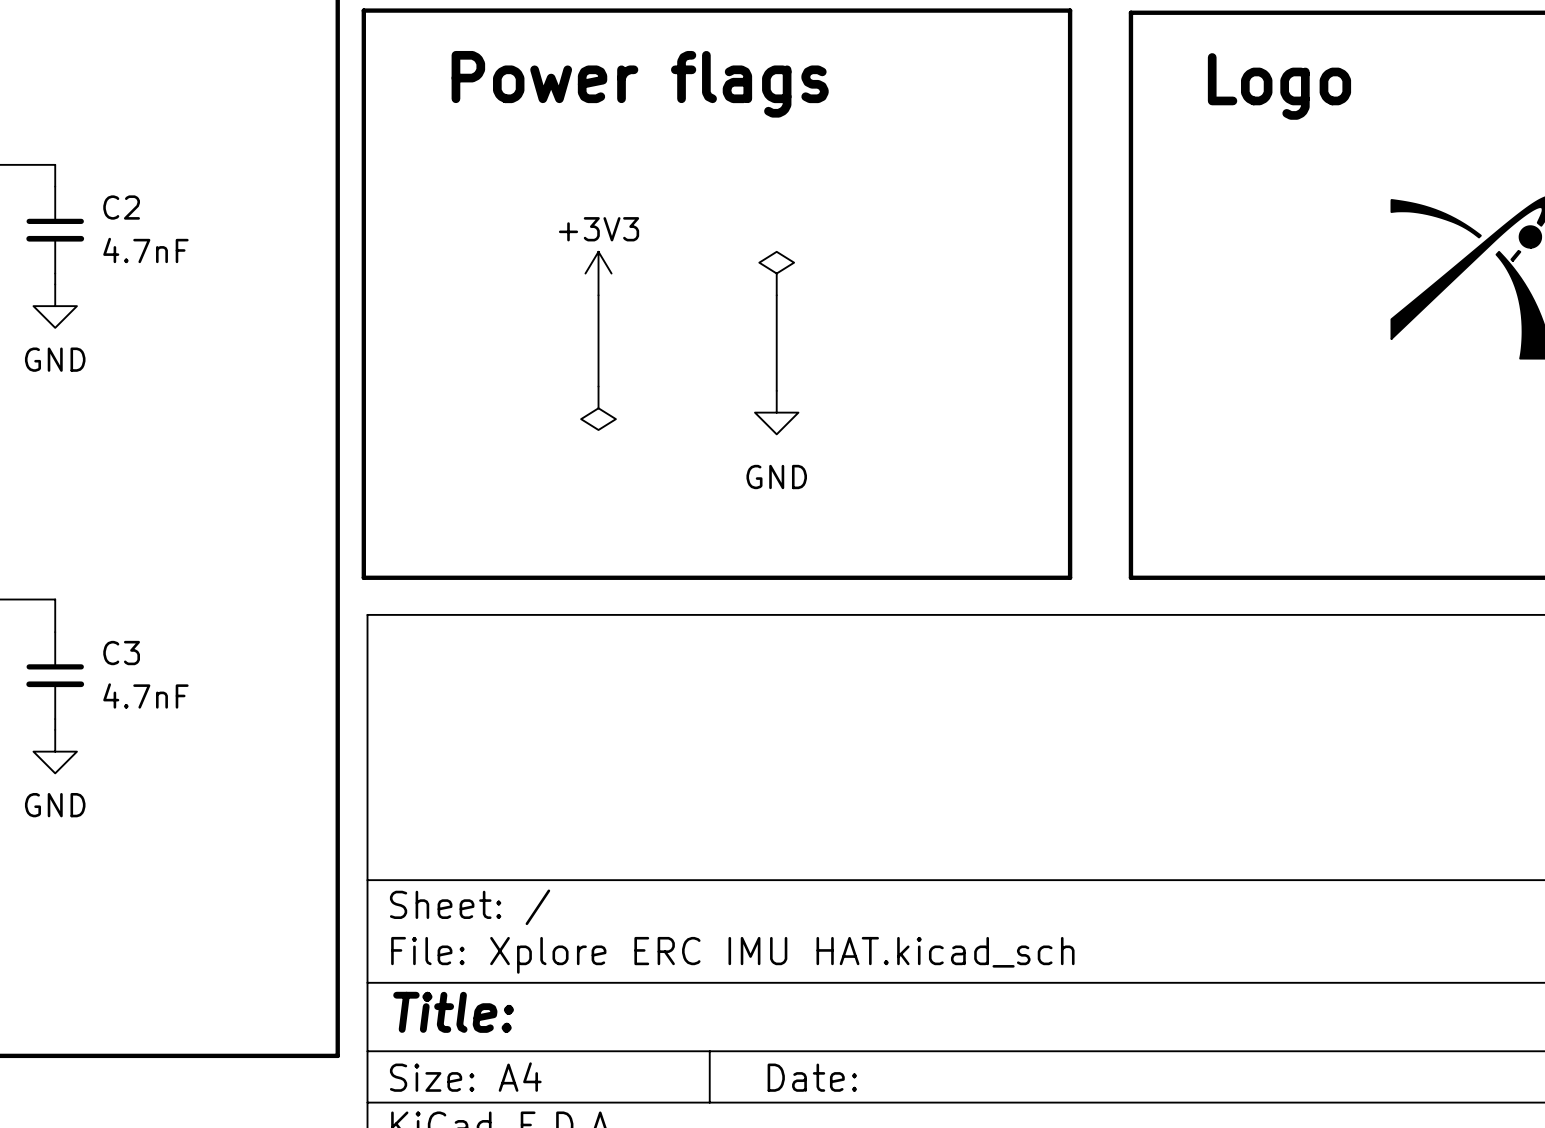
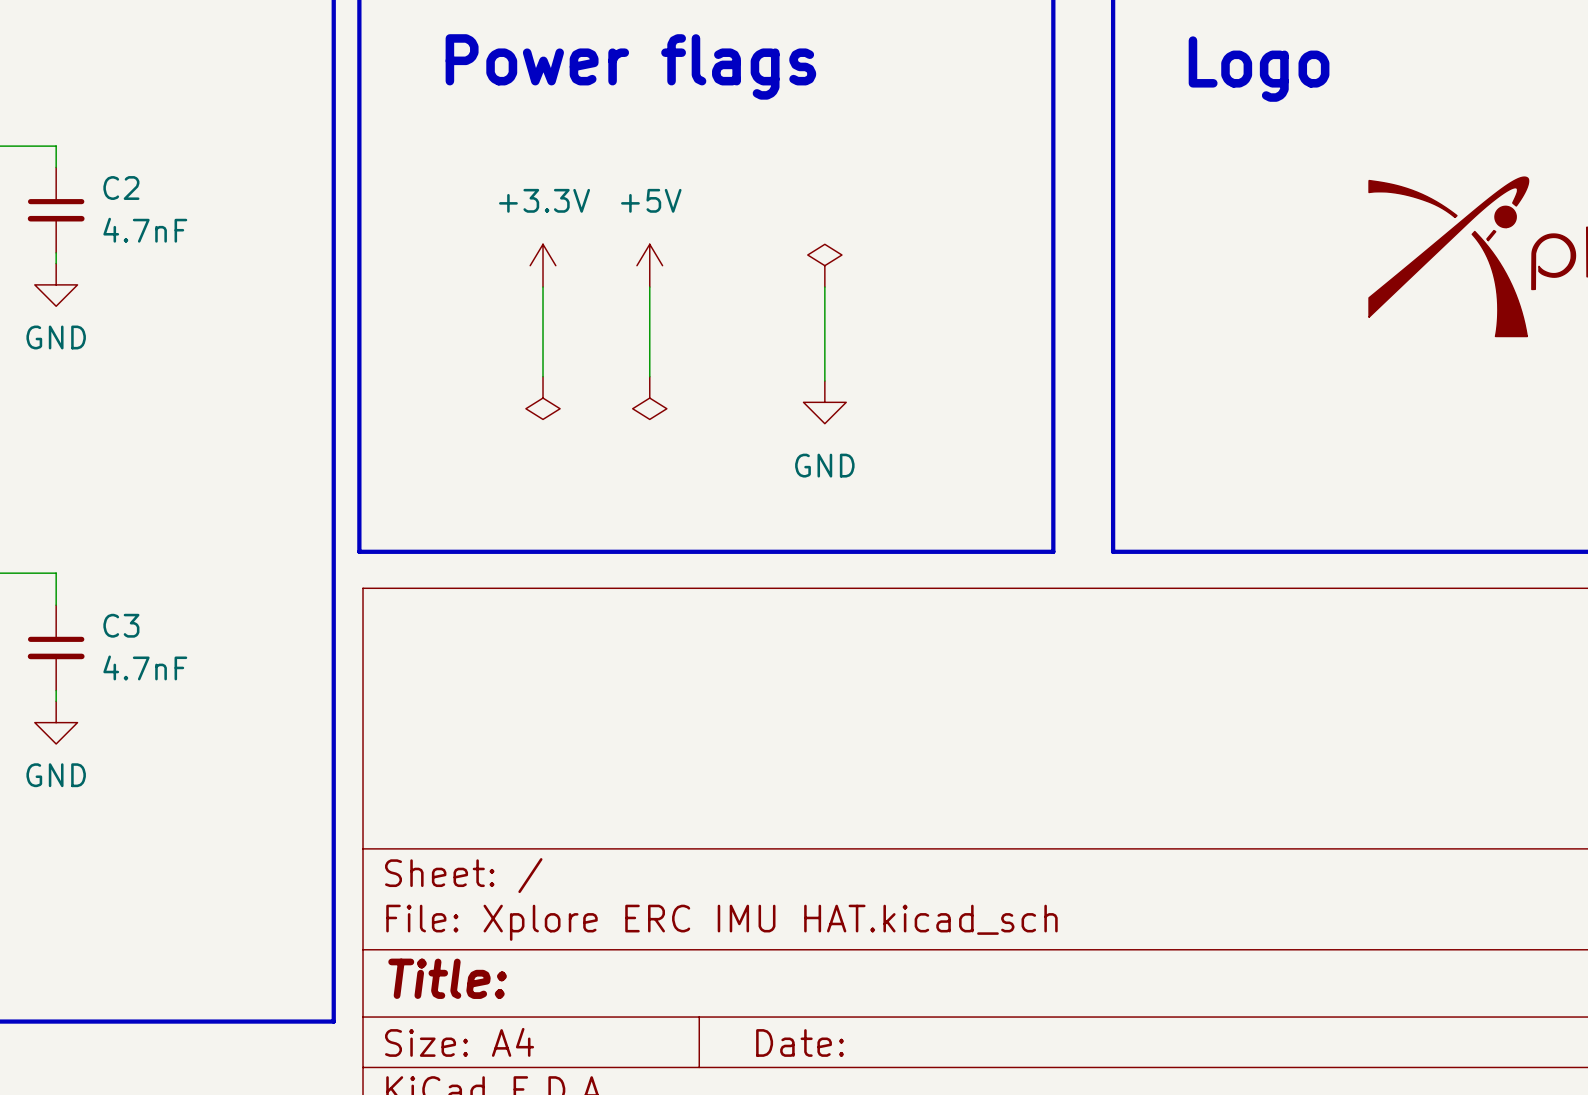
power symbol: +3V3 (598, 273) -> none
power symbol position: (776, 273) -> (824, 265)
power symbol: none -> +3.3V (543, 265)
power symbol: none -> +5V (649, 265)
wire: (598, 295) (598, 386) -> (543, 287) (543, 376)
wire: (776, 295) (776, 390) -> (824, 287) (824, 380)
wire: none -> (649, 287) (649, 376)
power symbol: (598, 408) -> none
power symbol position: GND (776, 412) -> GND (824, 402)
power symbol: none -> (543, 398)
power symbol: none -> (649, 398)

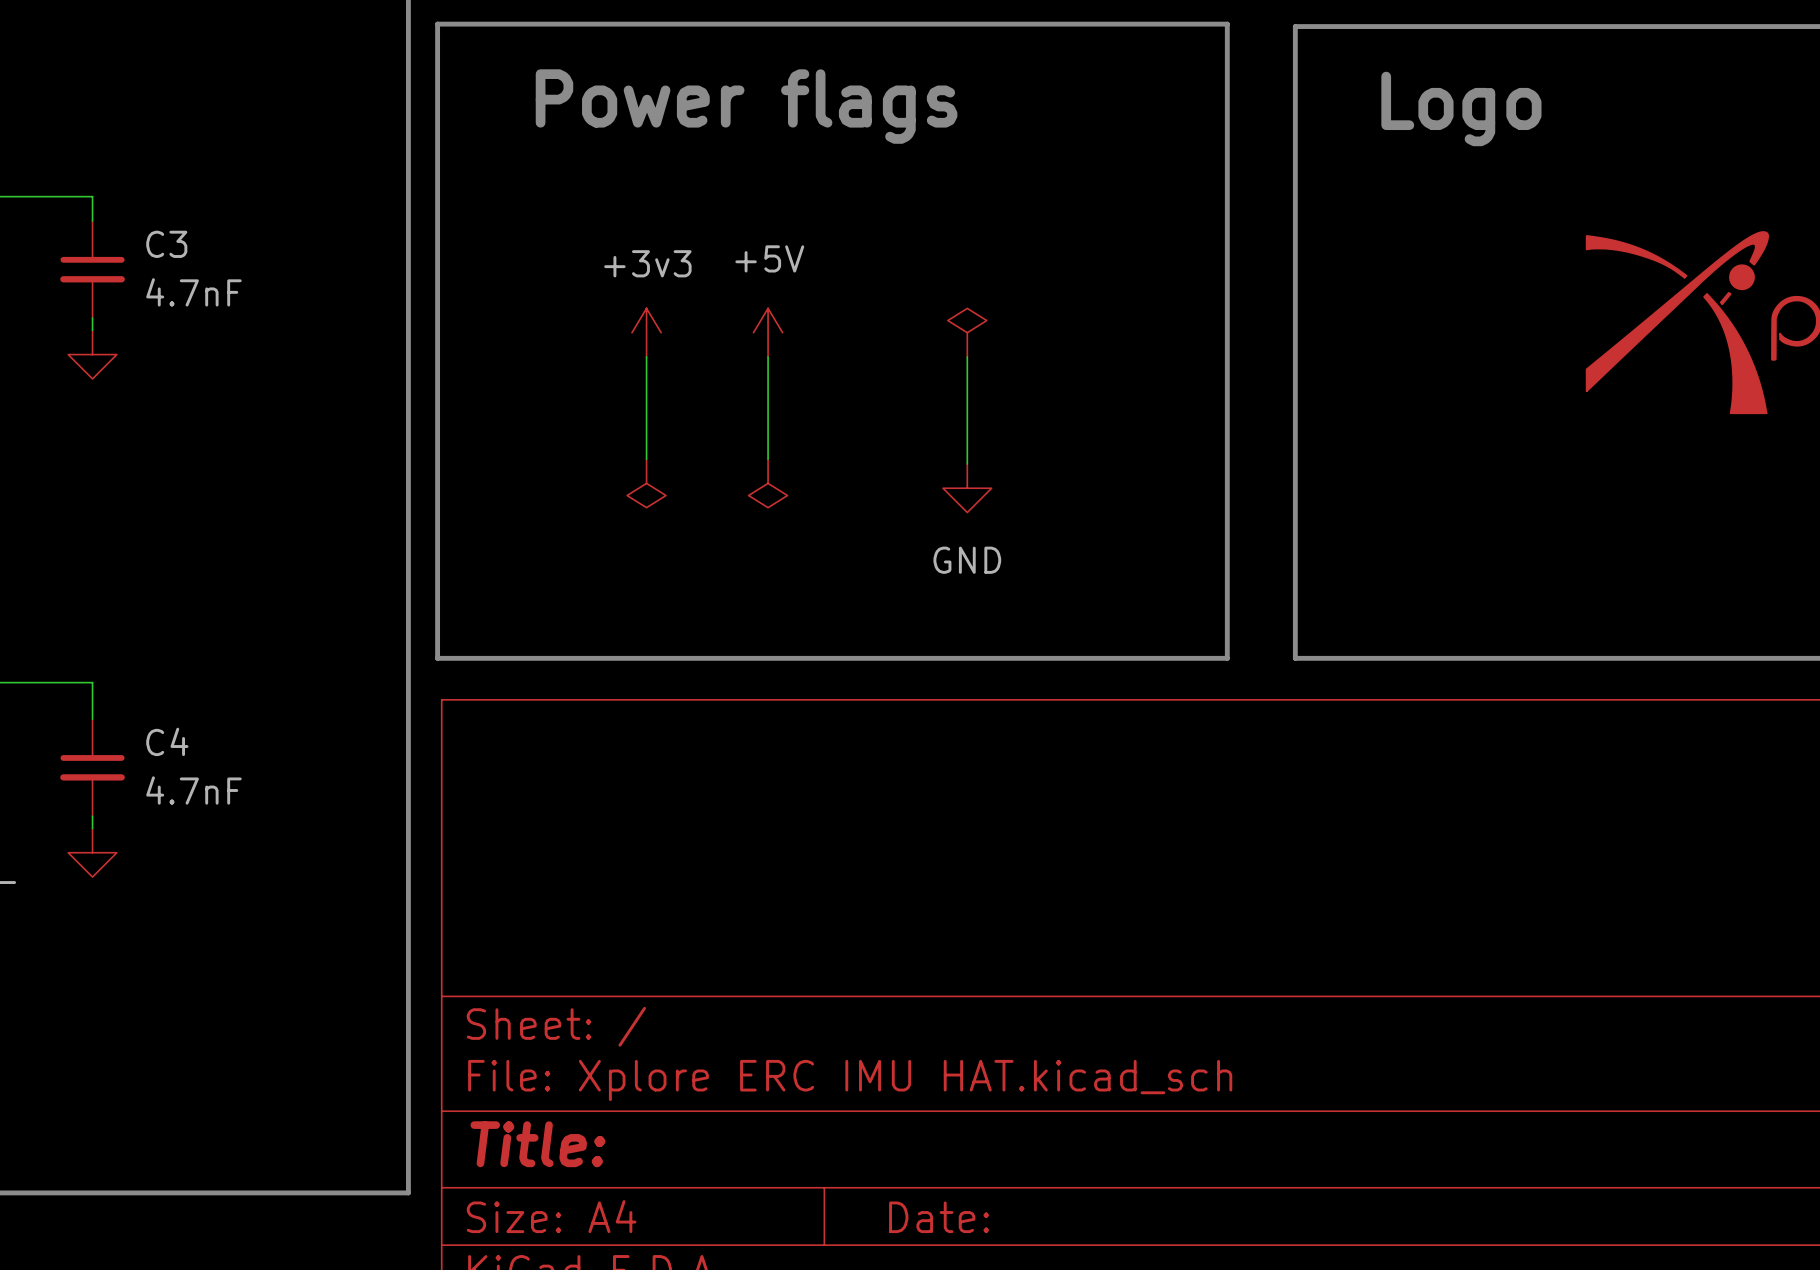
C2 name: C2 (121, 188) -> C3 (166, 244)
power symbol: +3.3V (543, 265) -> +3v3 (646, 332)
power symbol text: GND (56, 337) -> none
C3 name: C3 (121, 625) -> C4 (167, 741)
power symbol text: GND (56, 775) -> none

